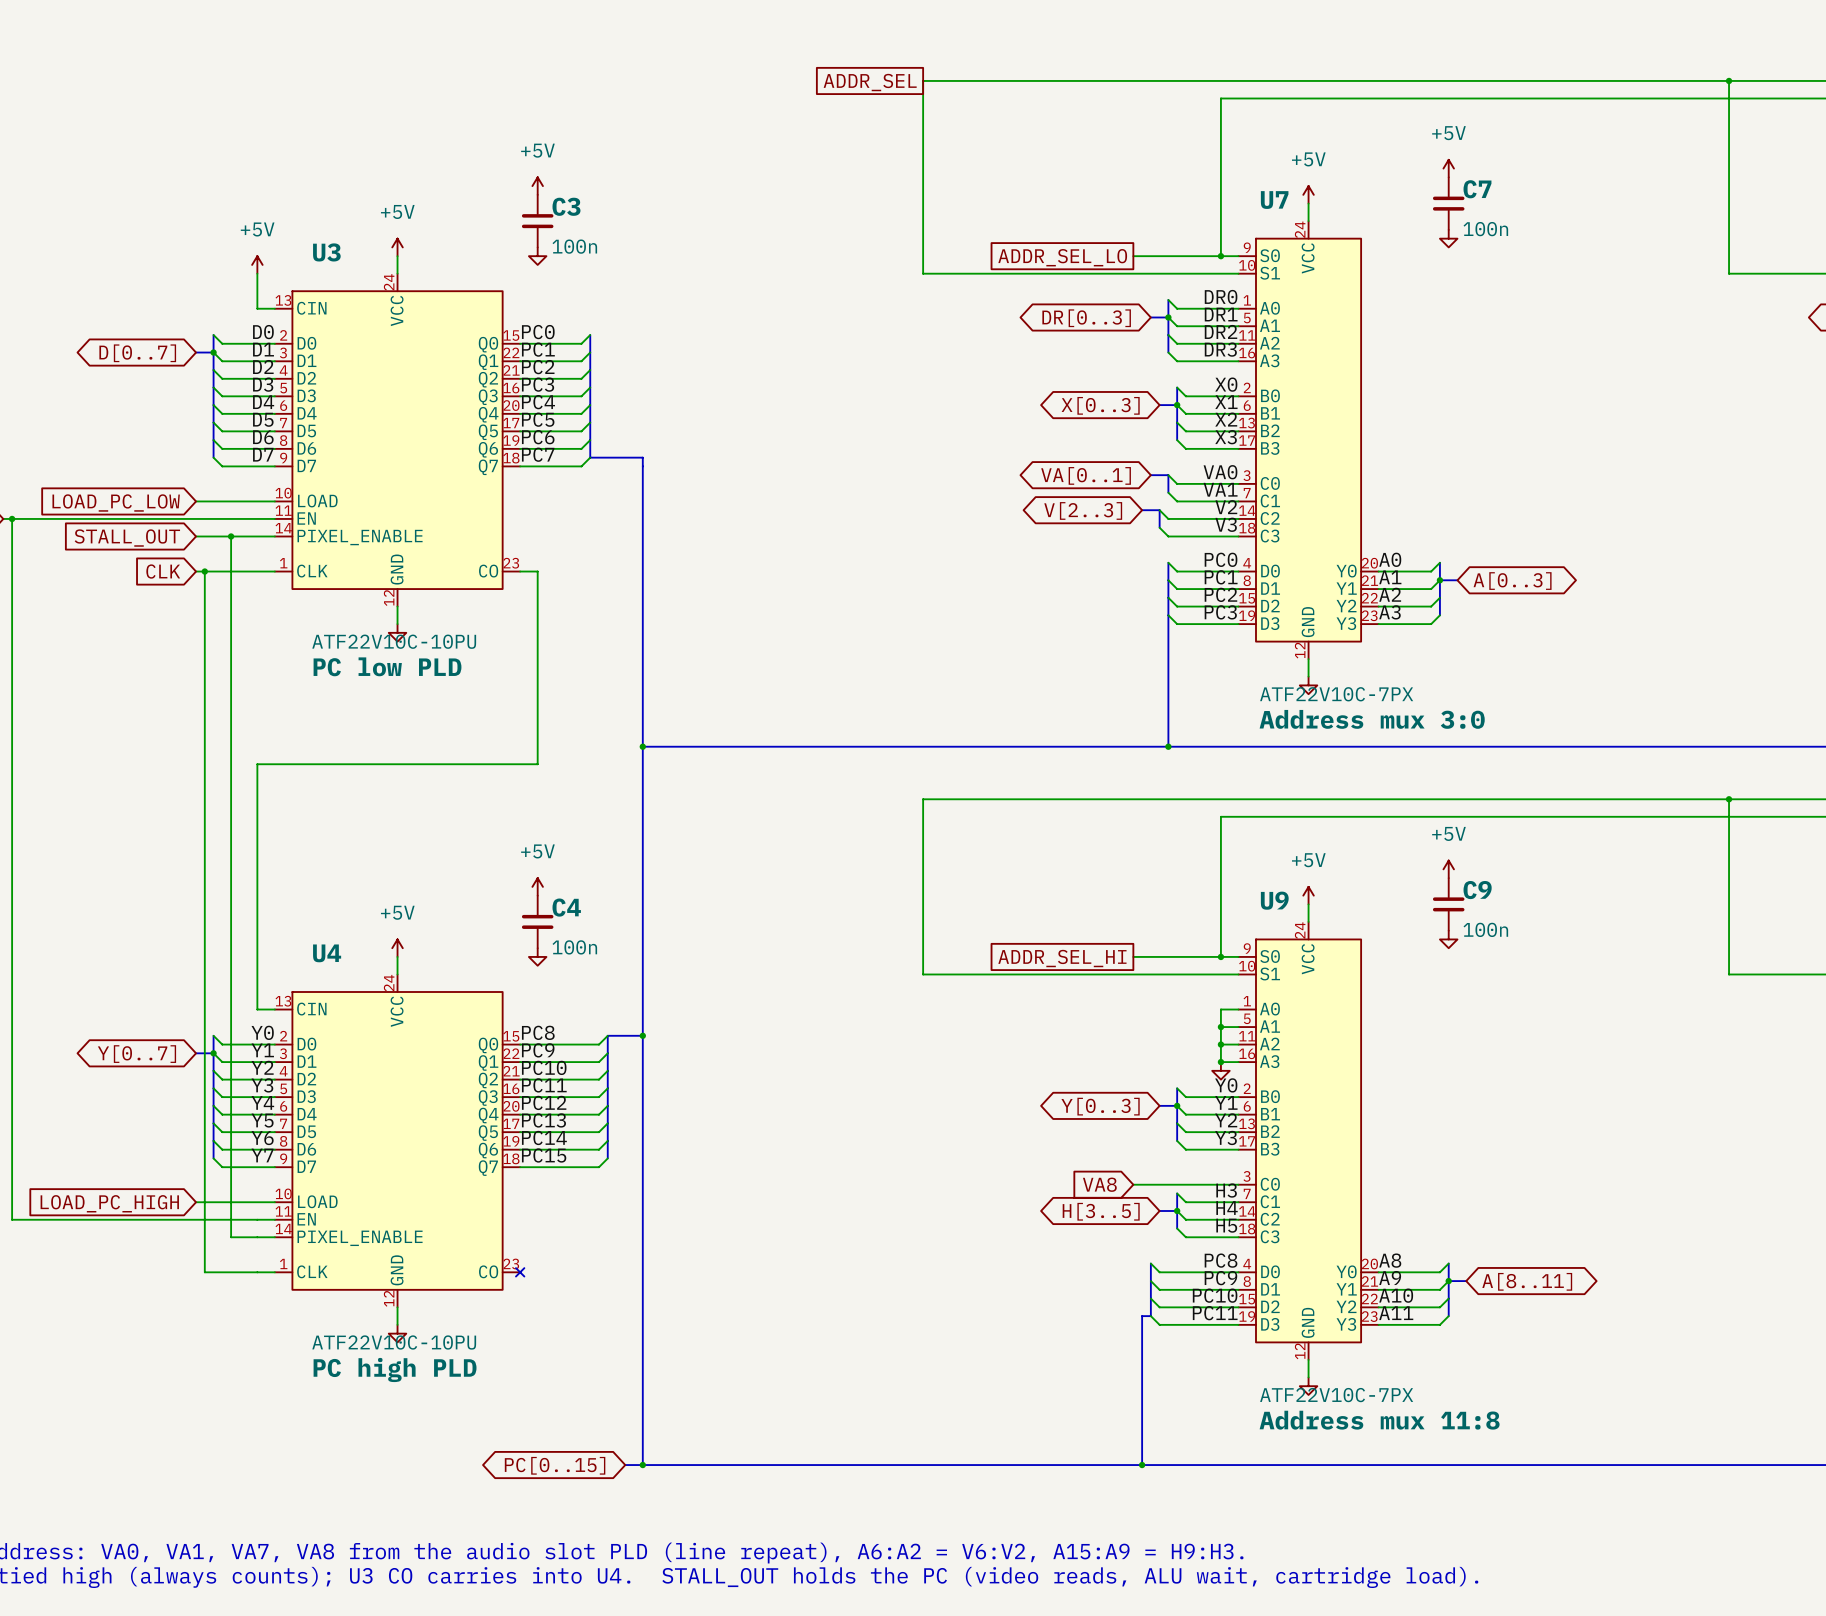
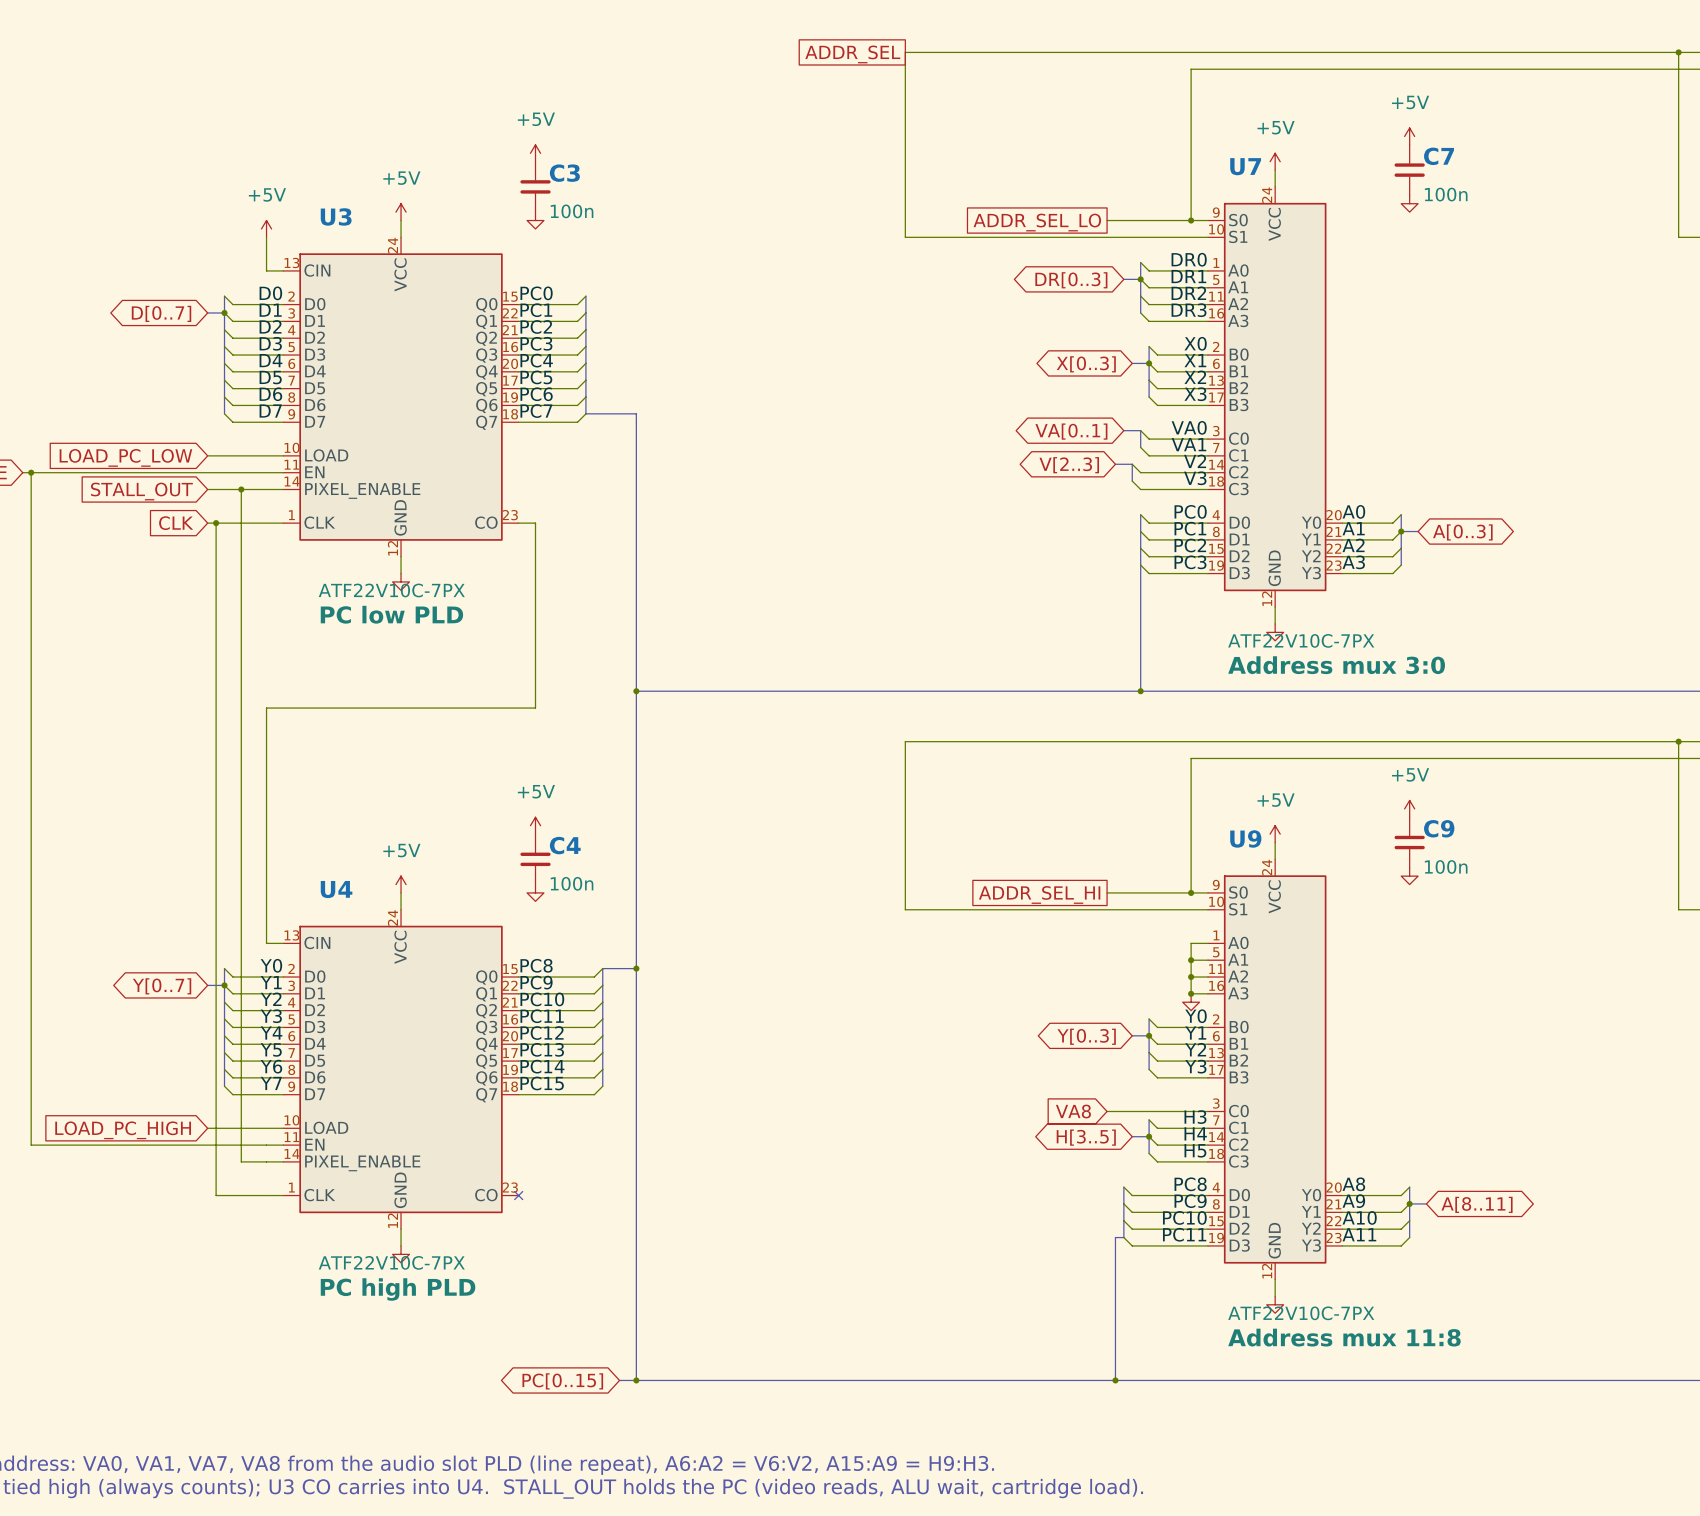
U3 value: ATF22V10C-10PU (394, 641) -> ATF22V10C-7PX (391, 590)
U4 value: ATF22V10C-10PU (394, 1342) -> ATF22V10C-7PX (391, 1262)

